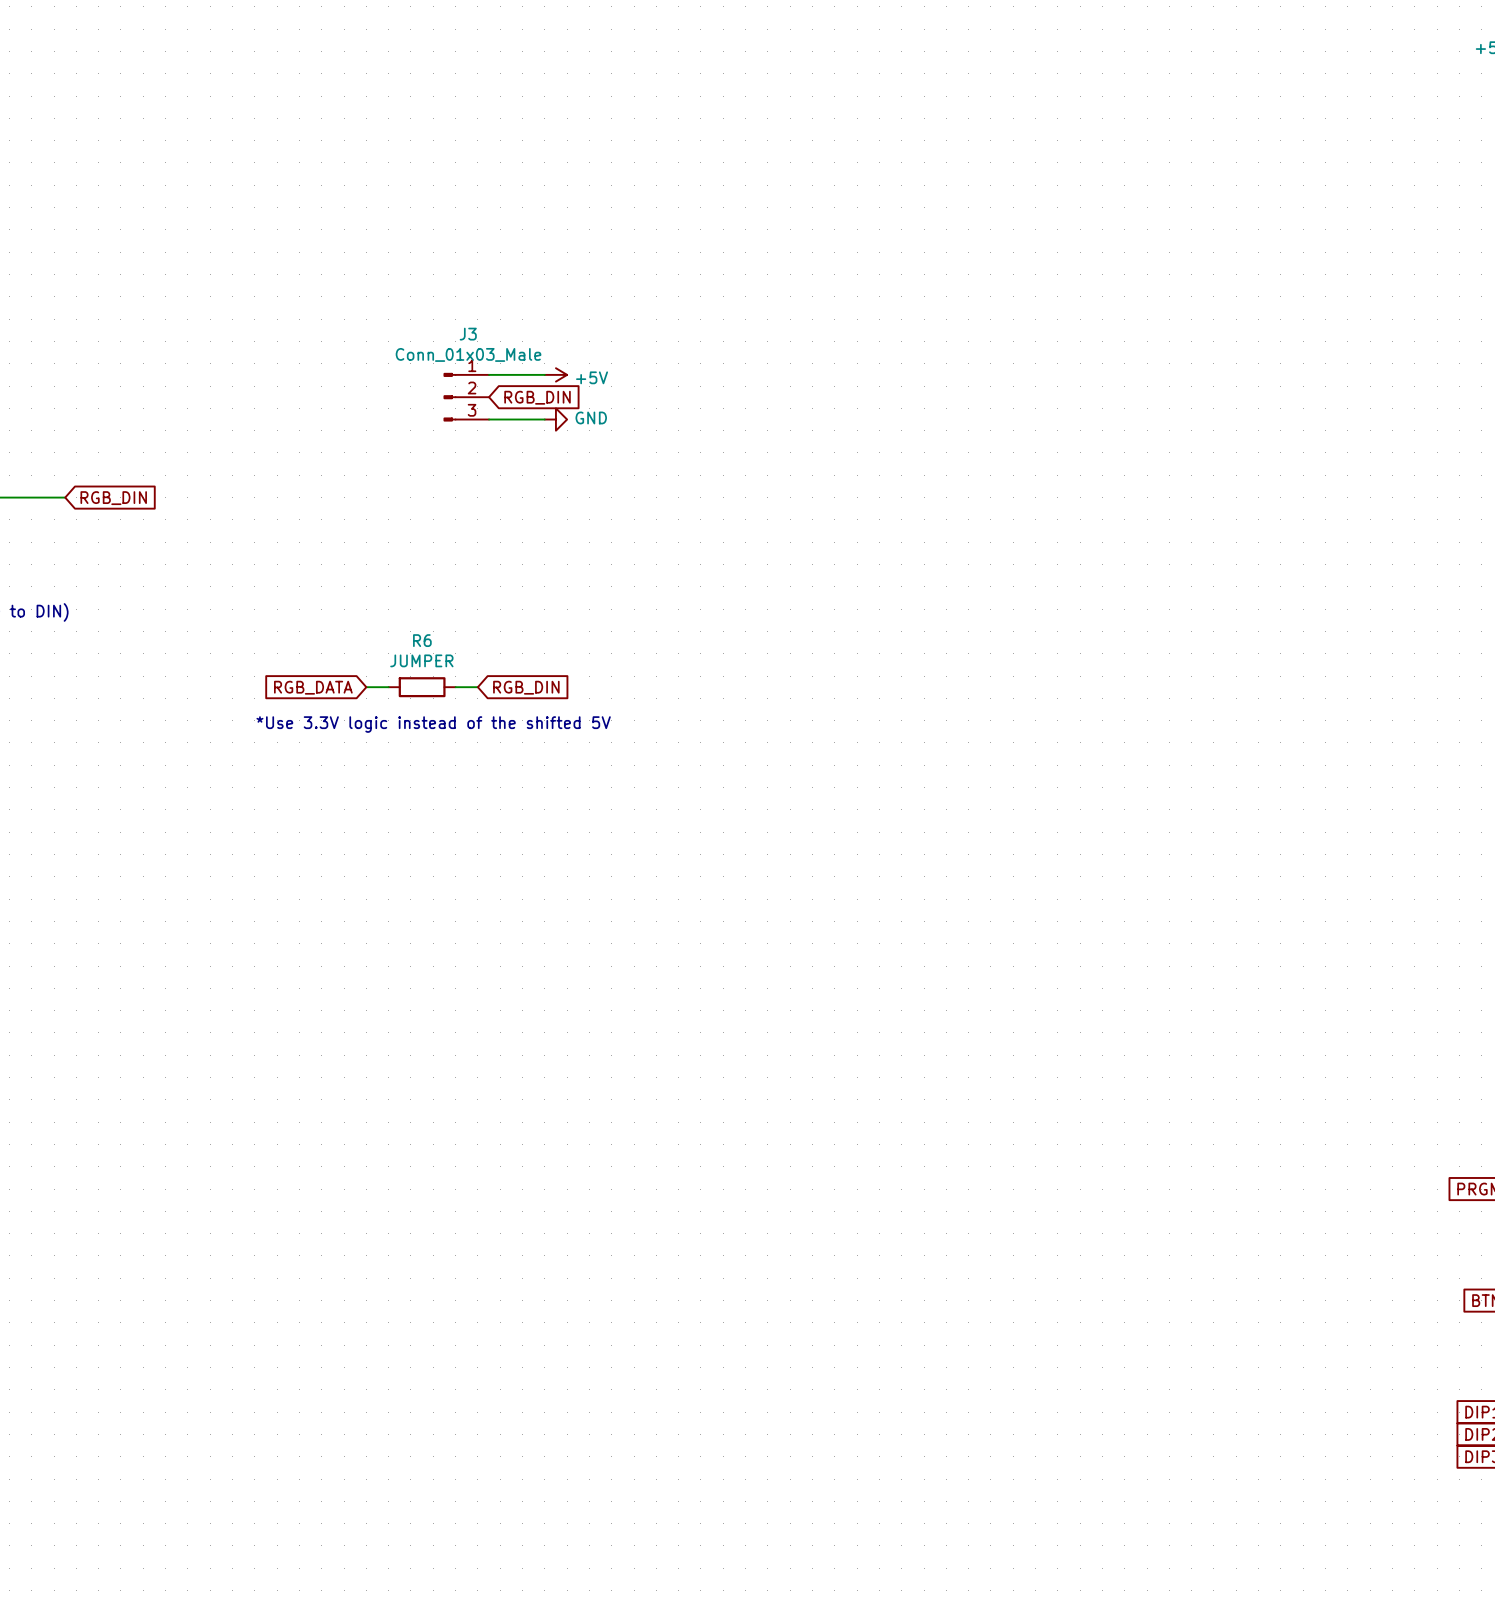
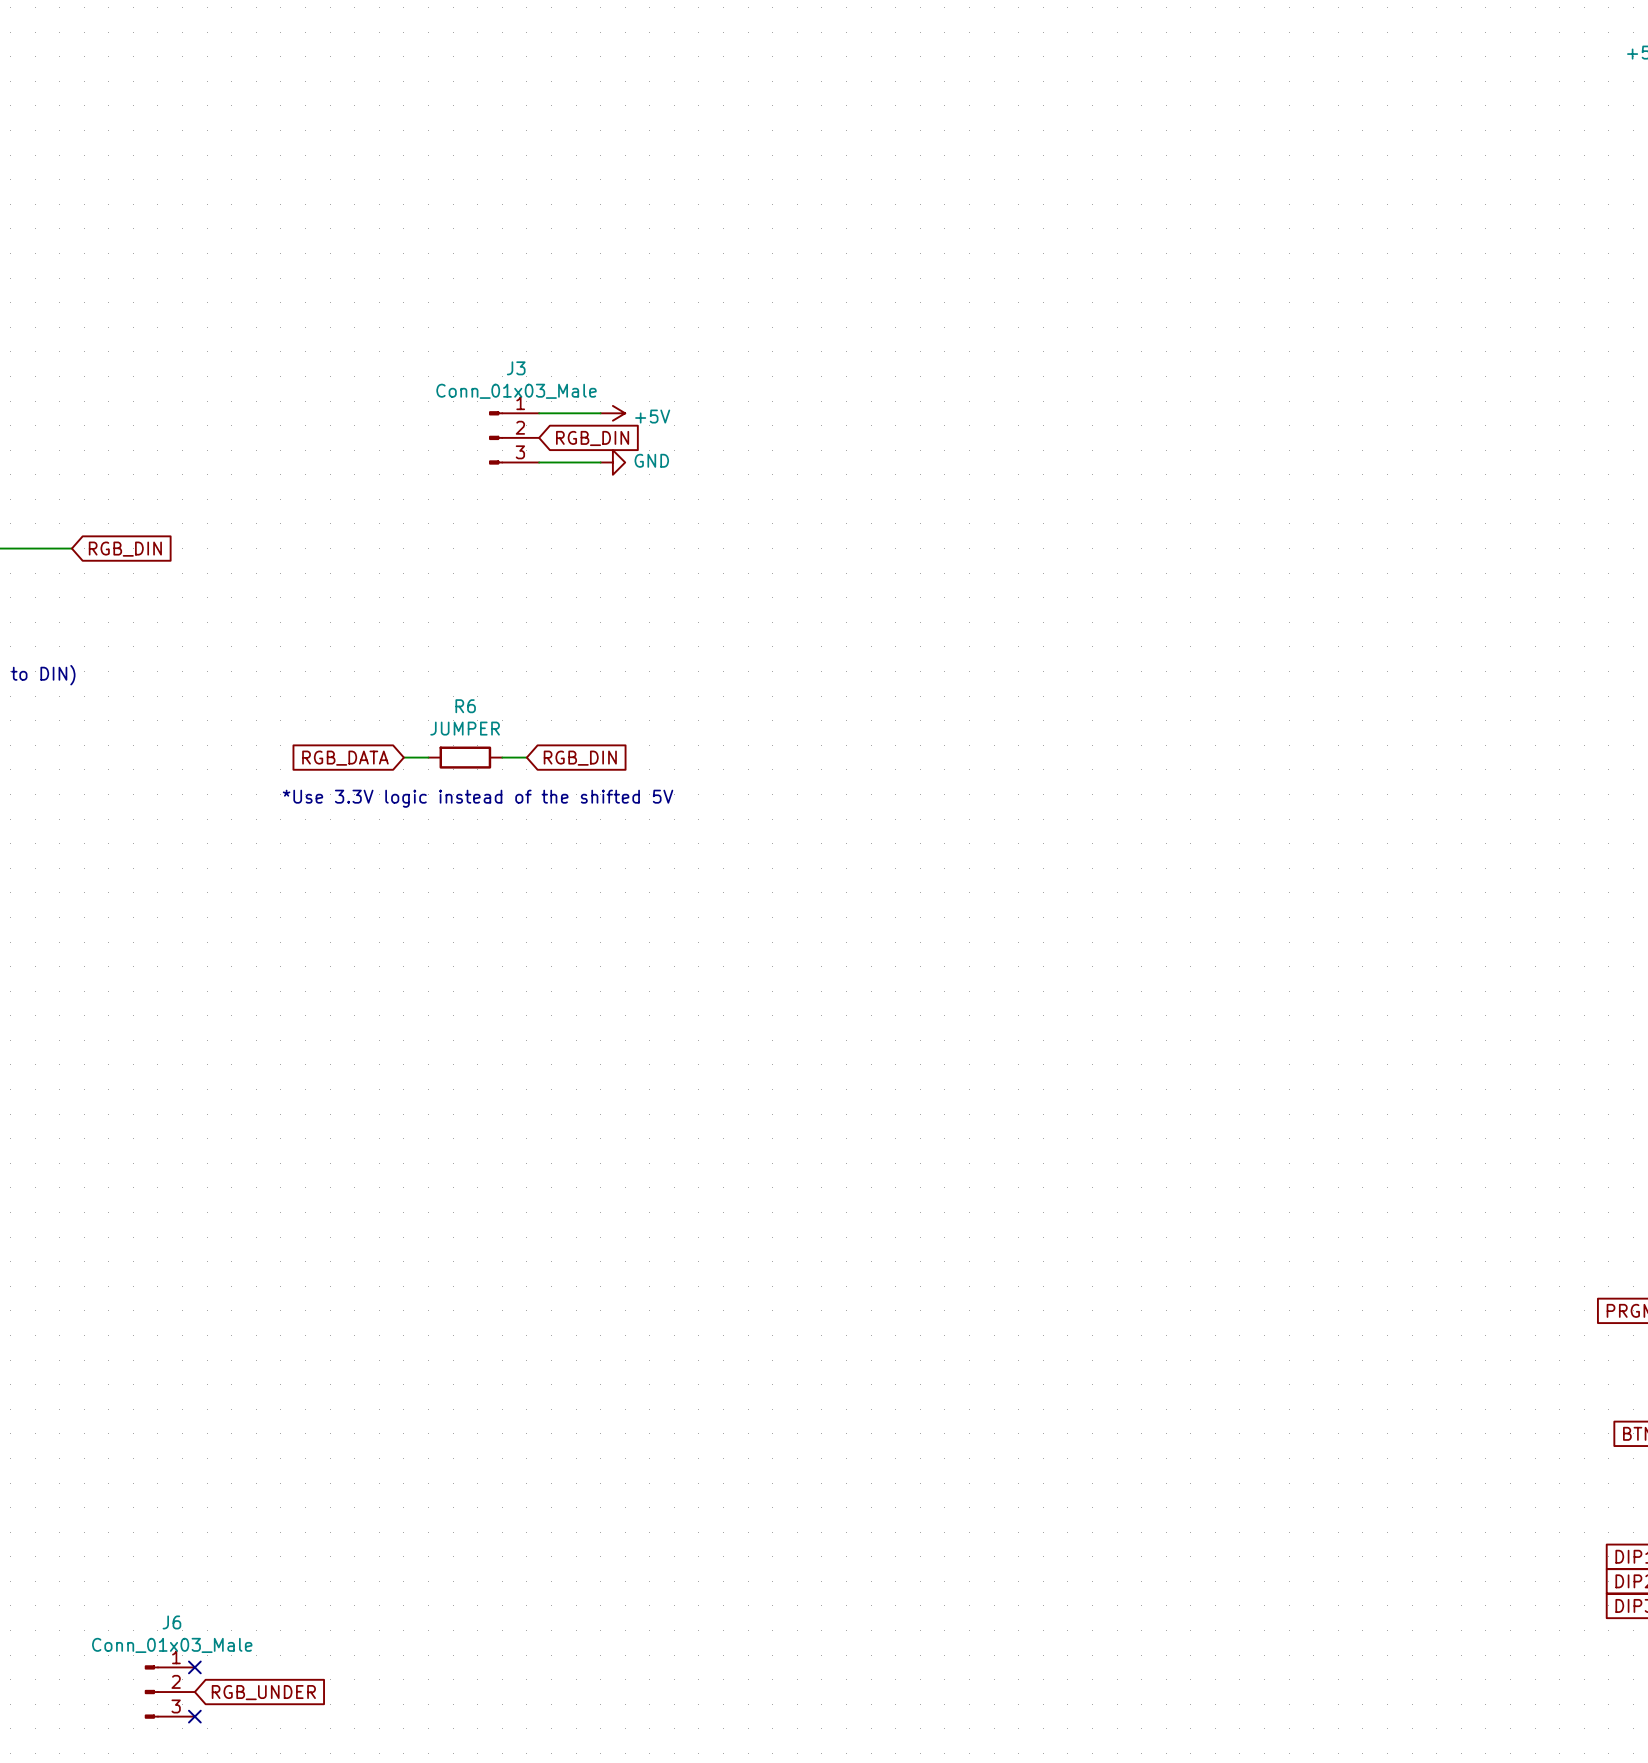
no-connect mark: none -> (194, 1667)
J6: none -> Conn_01x03_Male (169, 1692)
global label: none -> RGB_UNDER (263, 1692)
no-connect mark: none -> (194, 1716)

